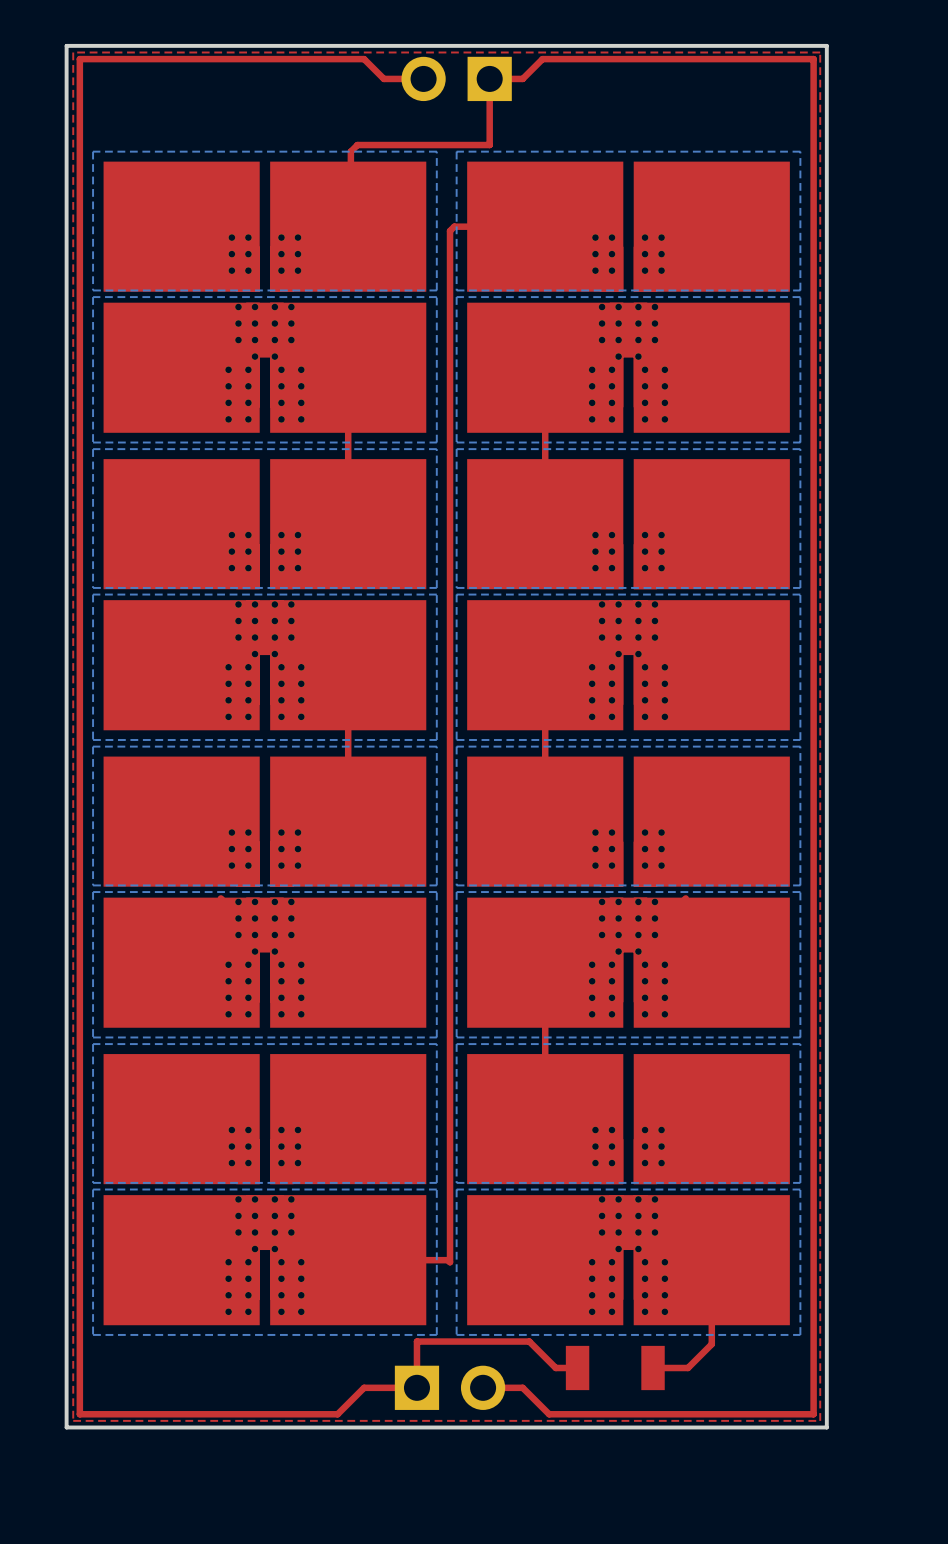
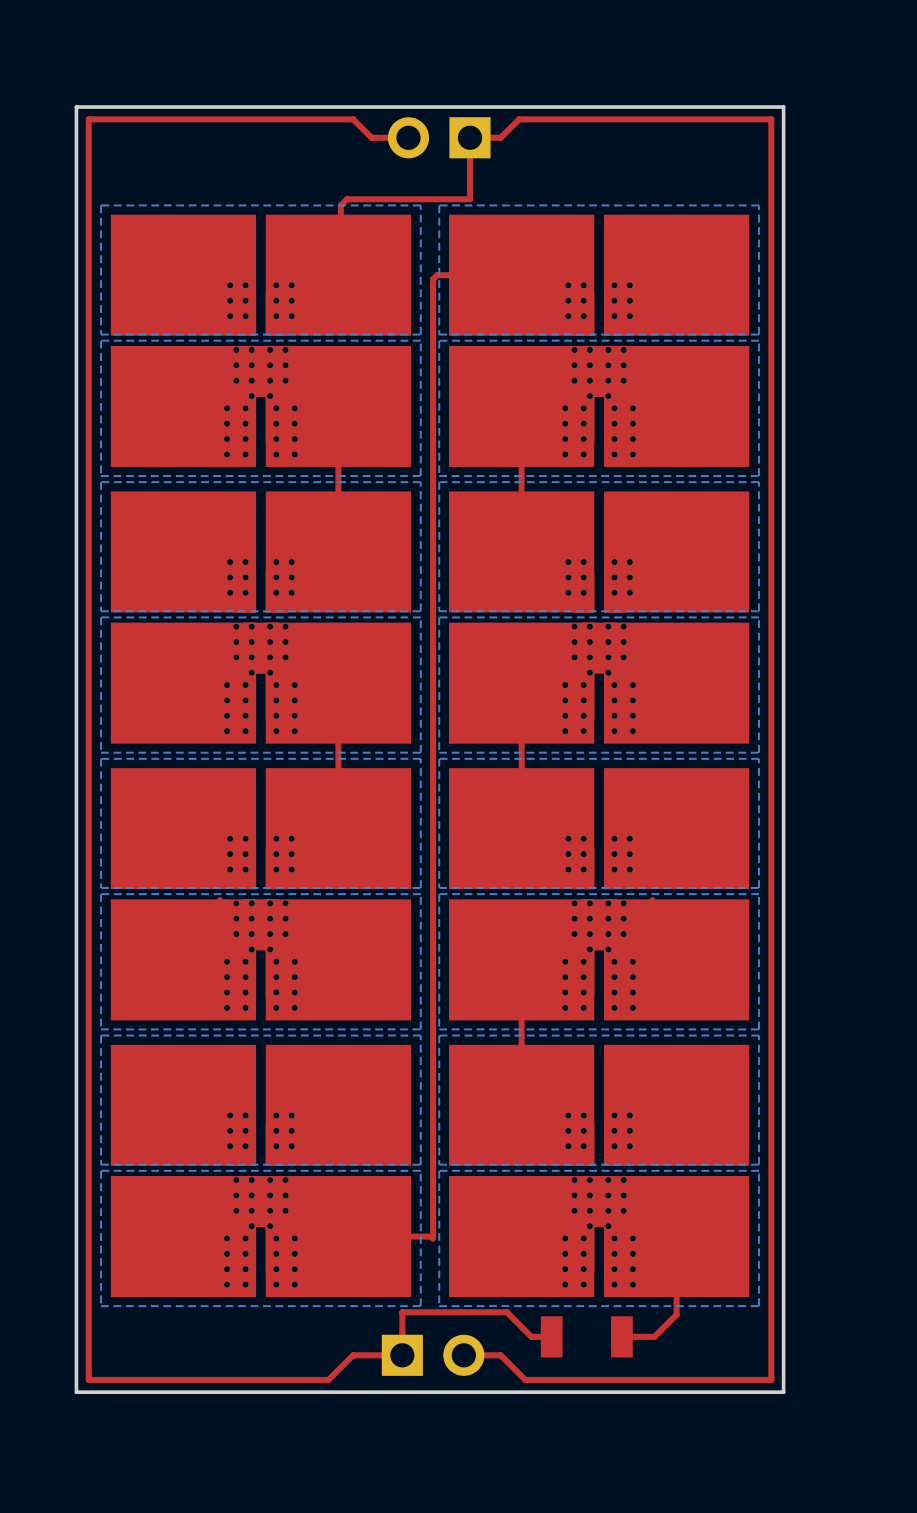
top zone outline: (820, 52) (820, 1420) (73, 1420) (73, 52) (820, 52) -> none

